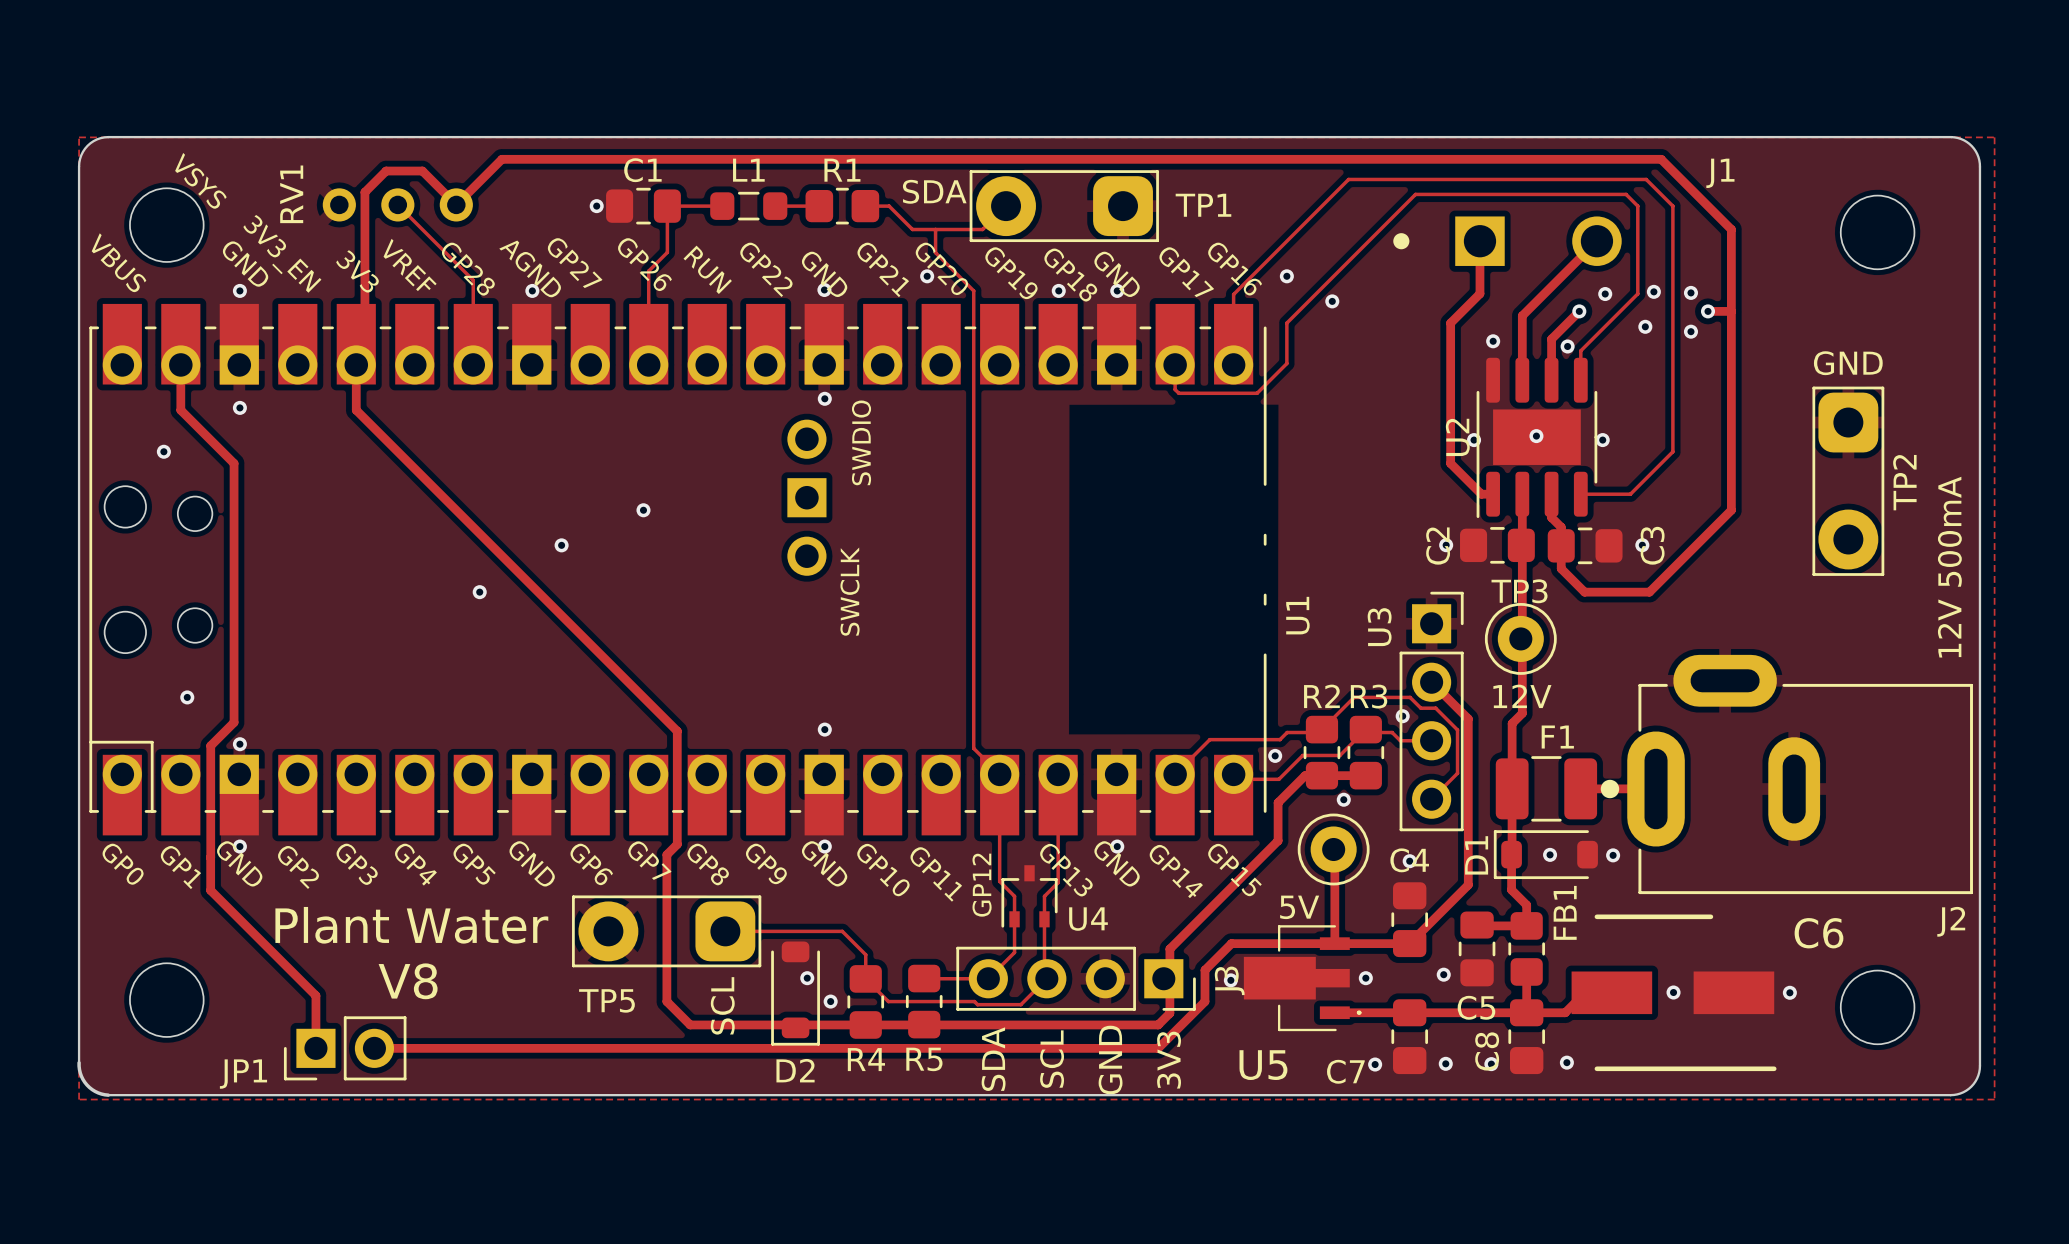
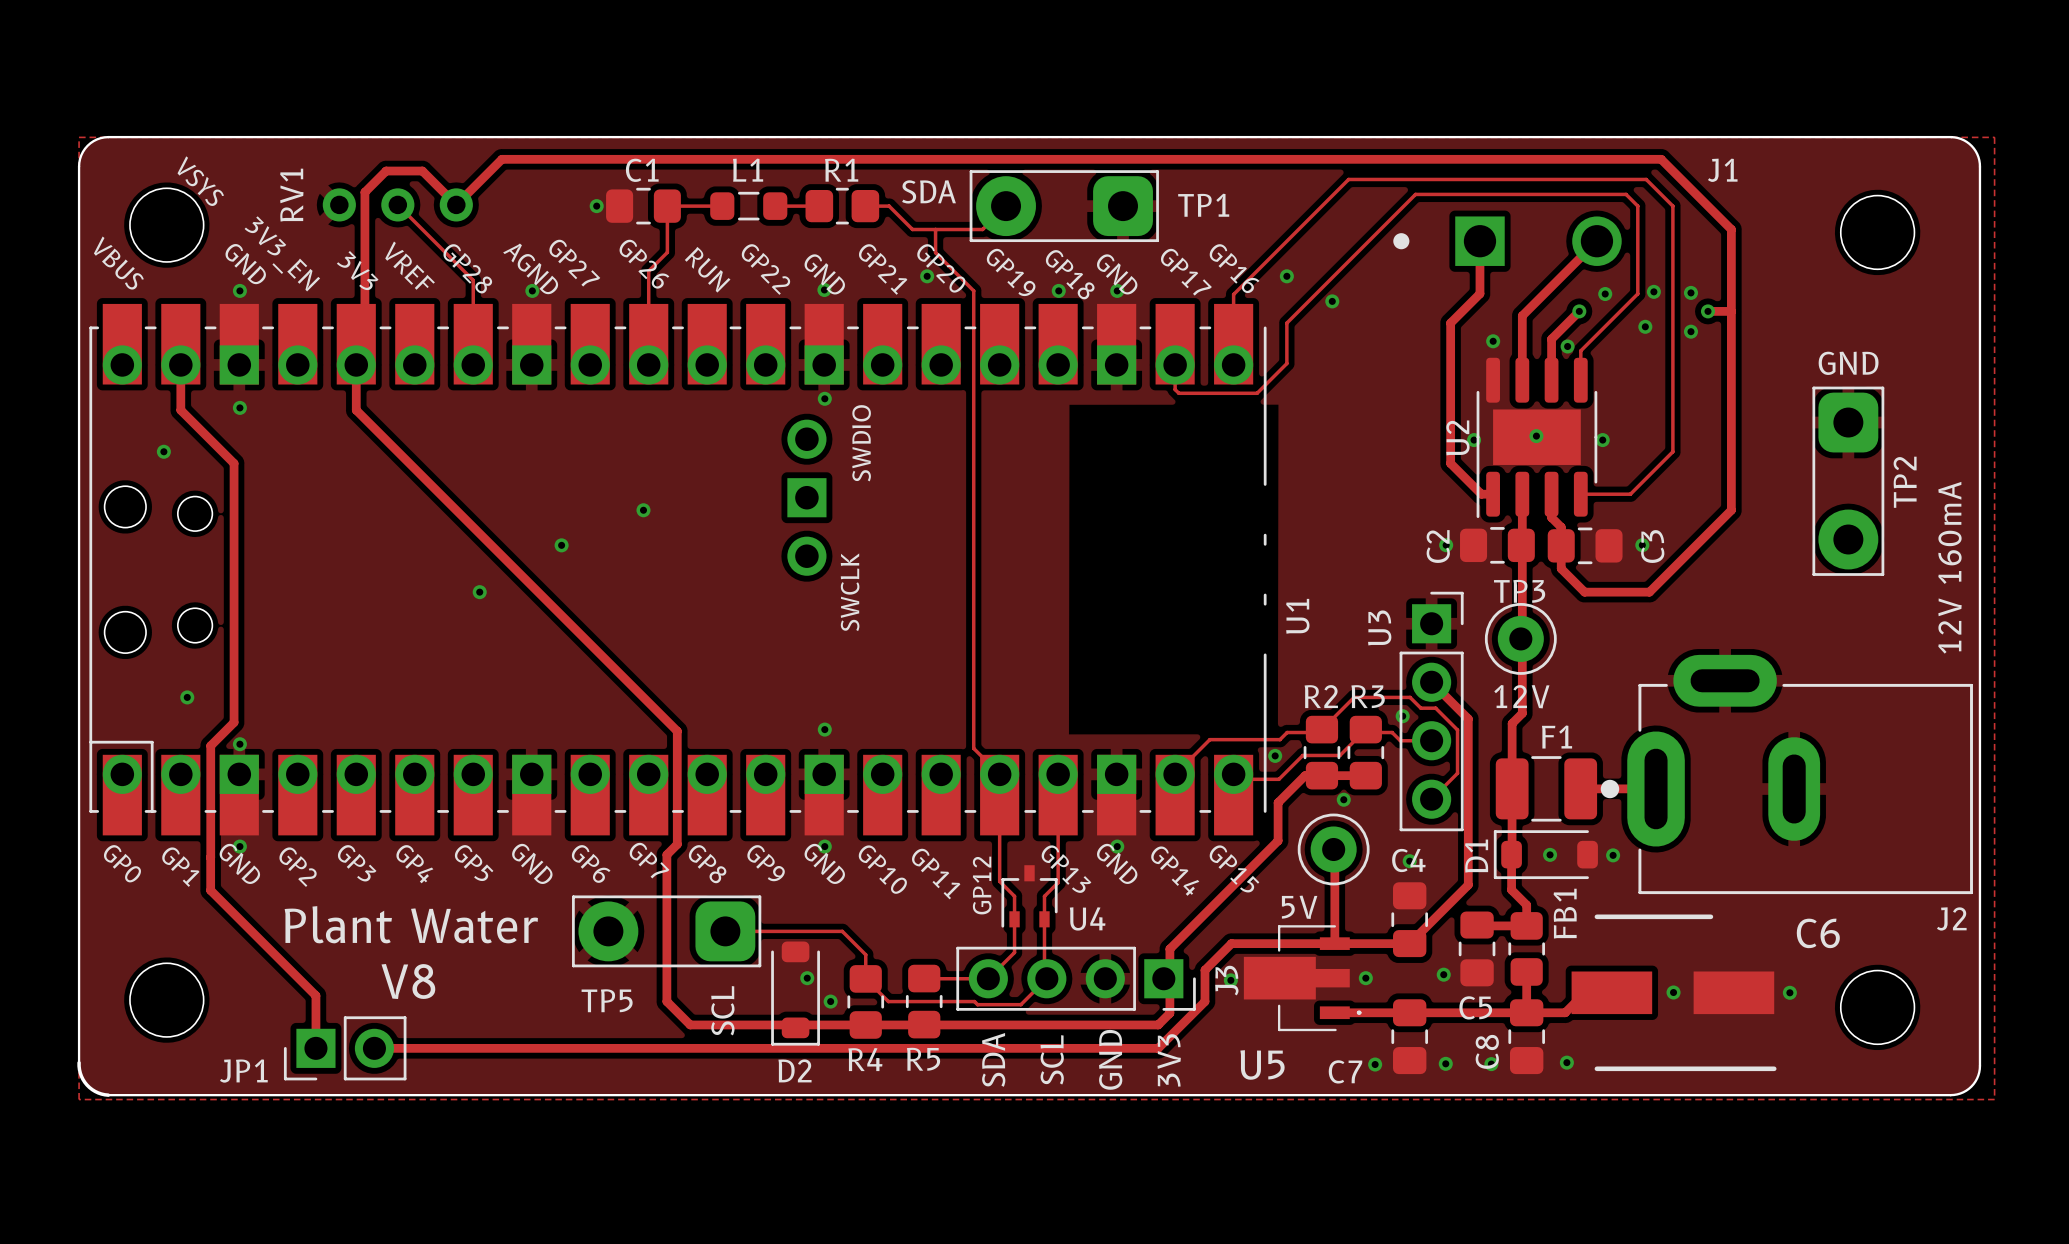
text: 12V 500mA (1949, 567) -> 12V 160mA (1950, 567)

